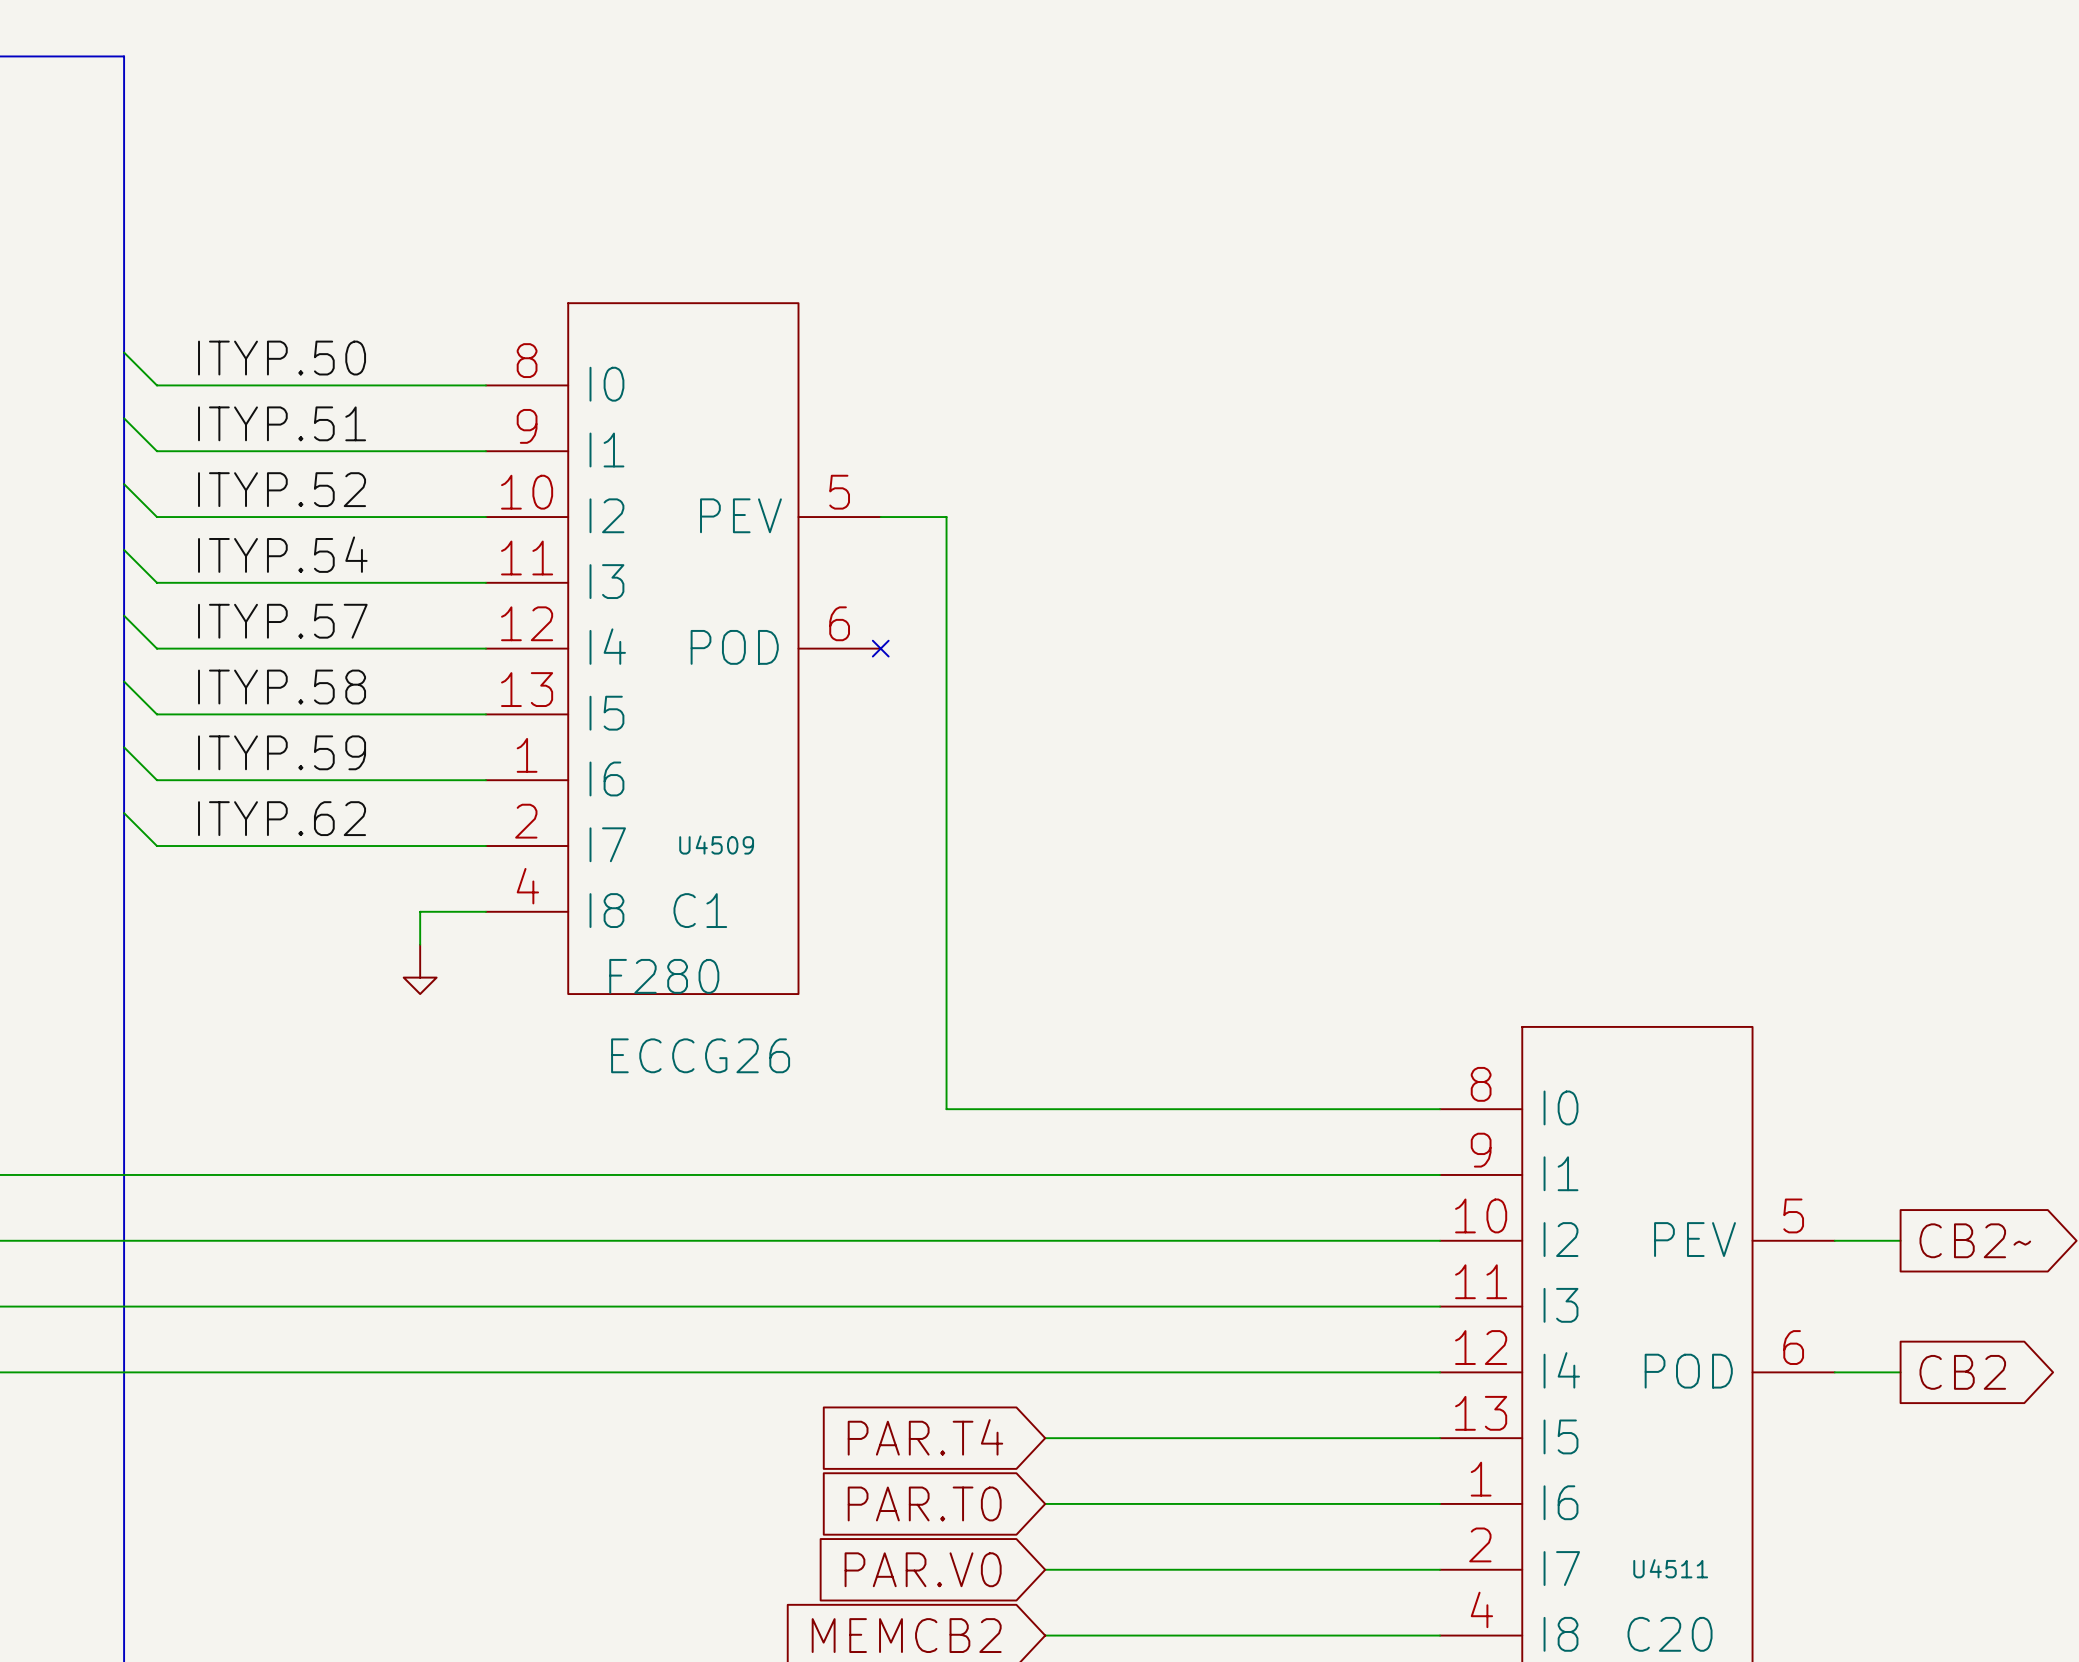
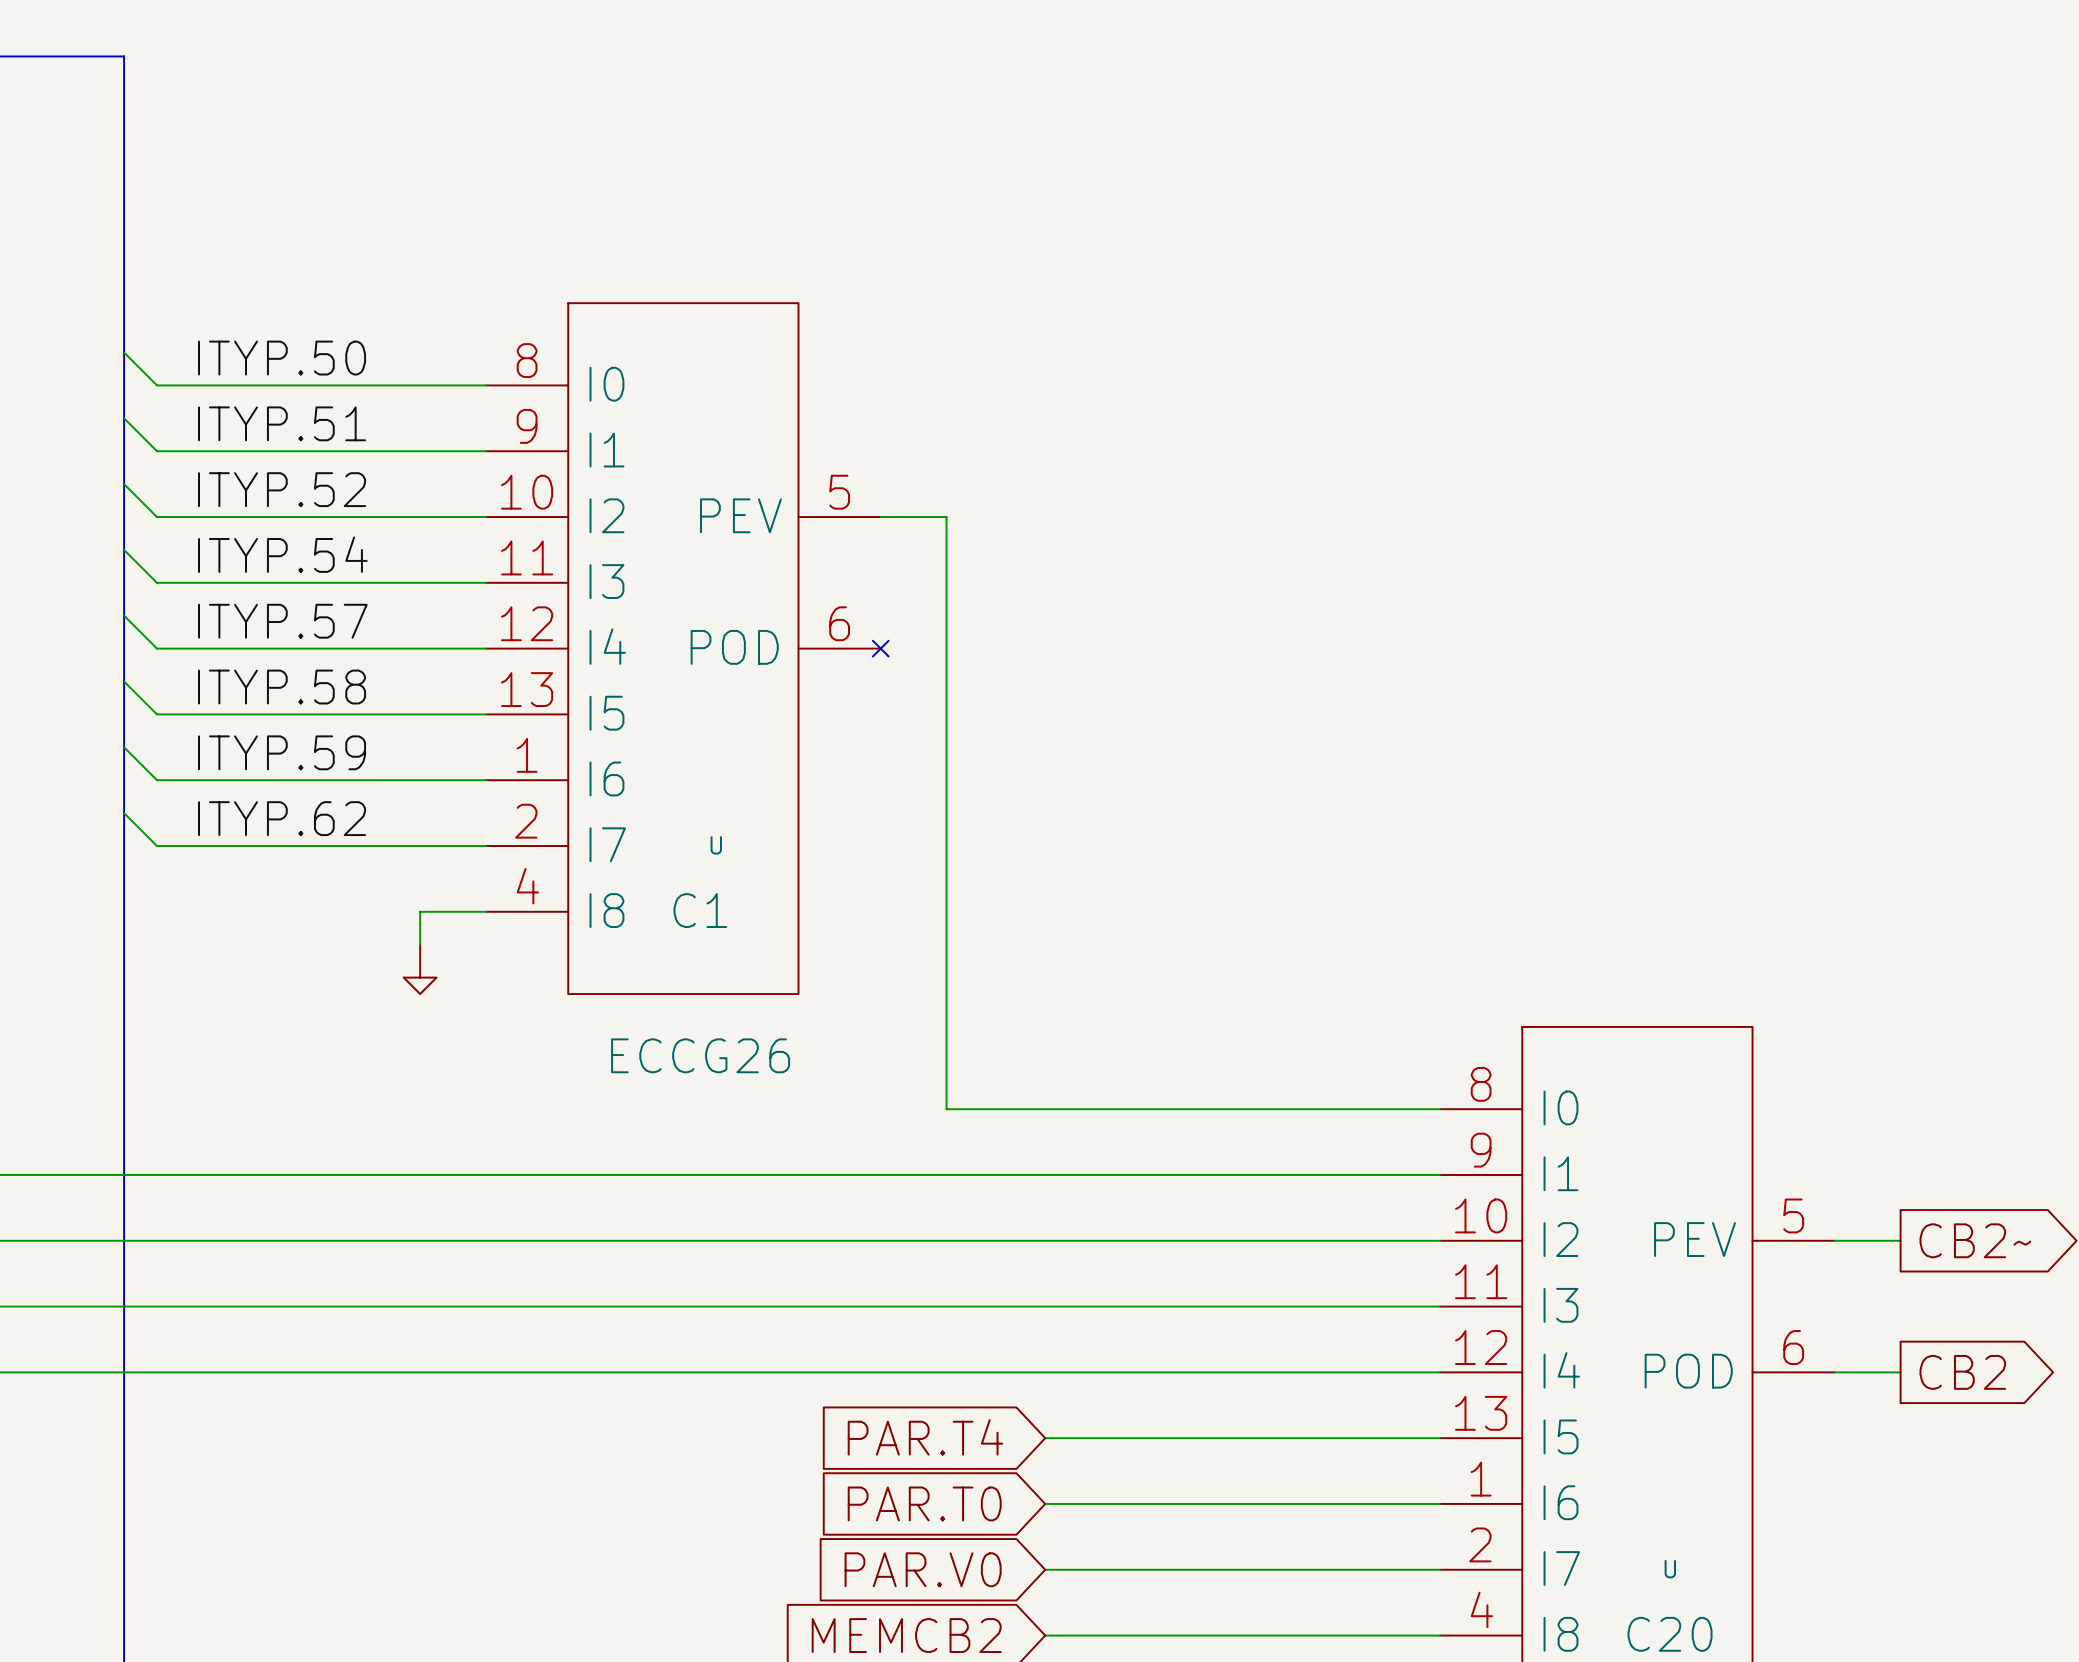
U4509 name: U4509 (716, 844) -> U (716, 845)
U4509 value: F280 (664, 976) -> none
U4511 name: U4511 (1670, 1568) -> U (1670, 1569)

